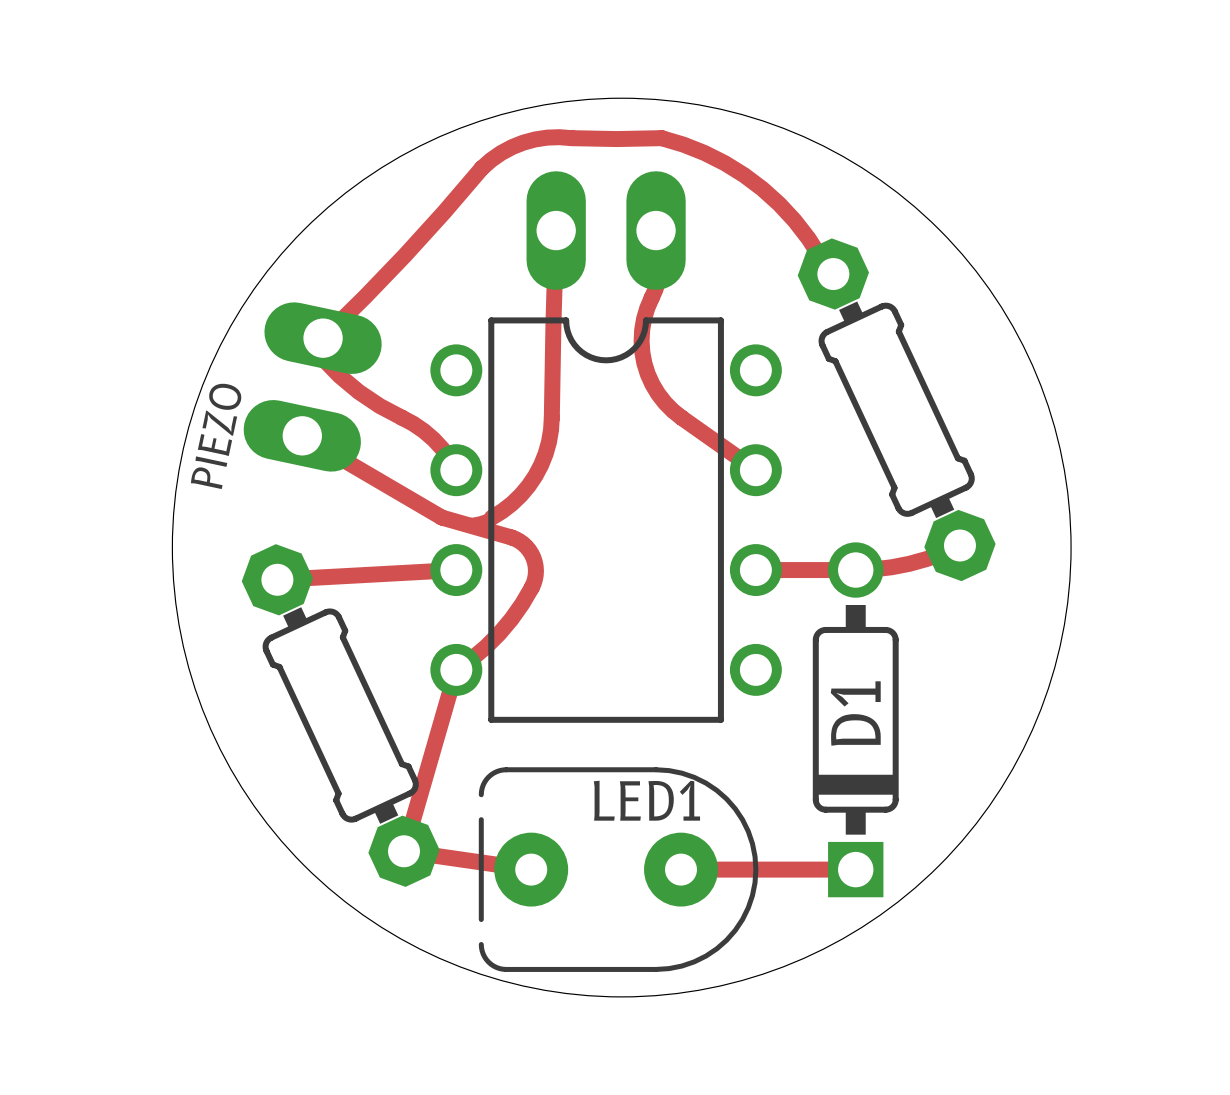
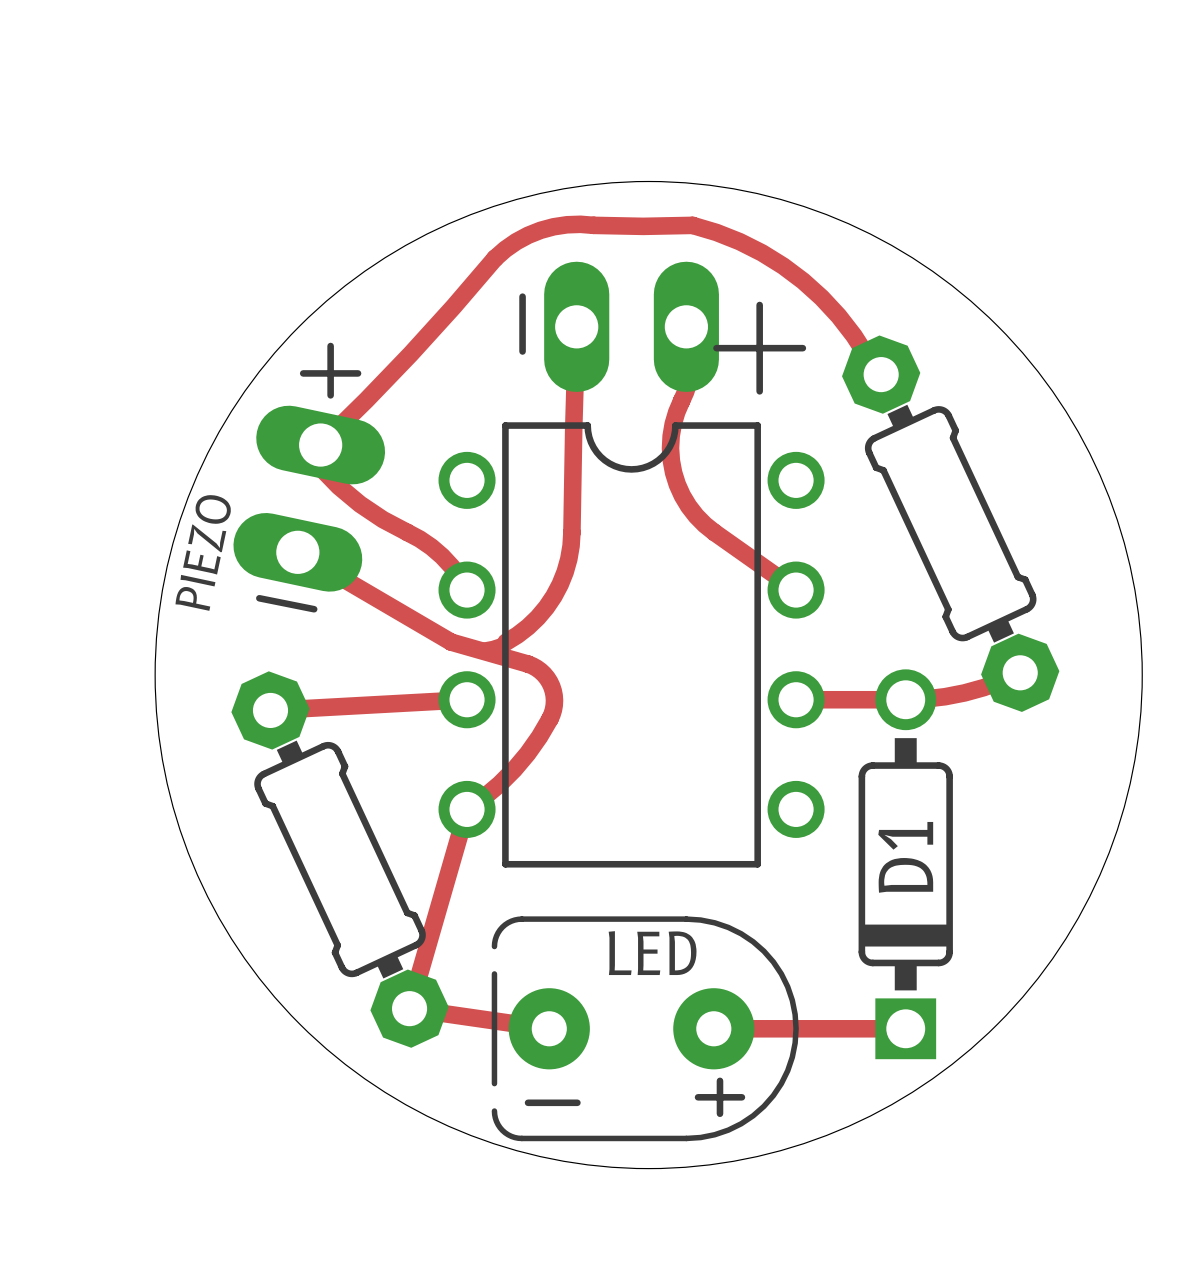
line: none -> (522, 296) (522, 351)
line: none -> (759, 304) (759, 391)
line: none -> (330, 346) (330, 395)
line: none -> (716, 348) (802, 348)
line: none -> (303, 373) (358, 373)
line: none -> (259, 598) (314, 609)
LED1 name: LED1 (646, 800) -> LED (652, 953)
line: none -> (719, 1080) (719, 1113)
line: none -> (698, 1097) (741, 1097)
line: none -> (528, 1102) (577, 1102)

